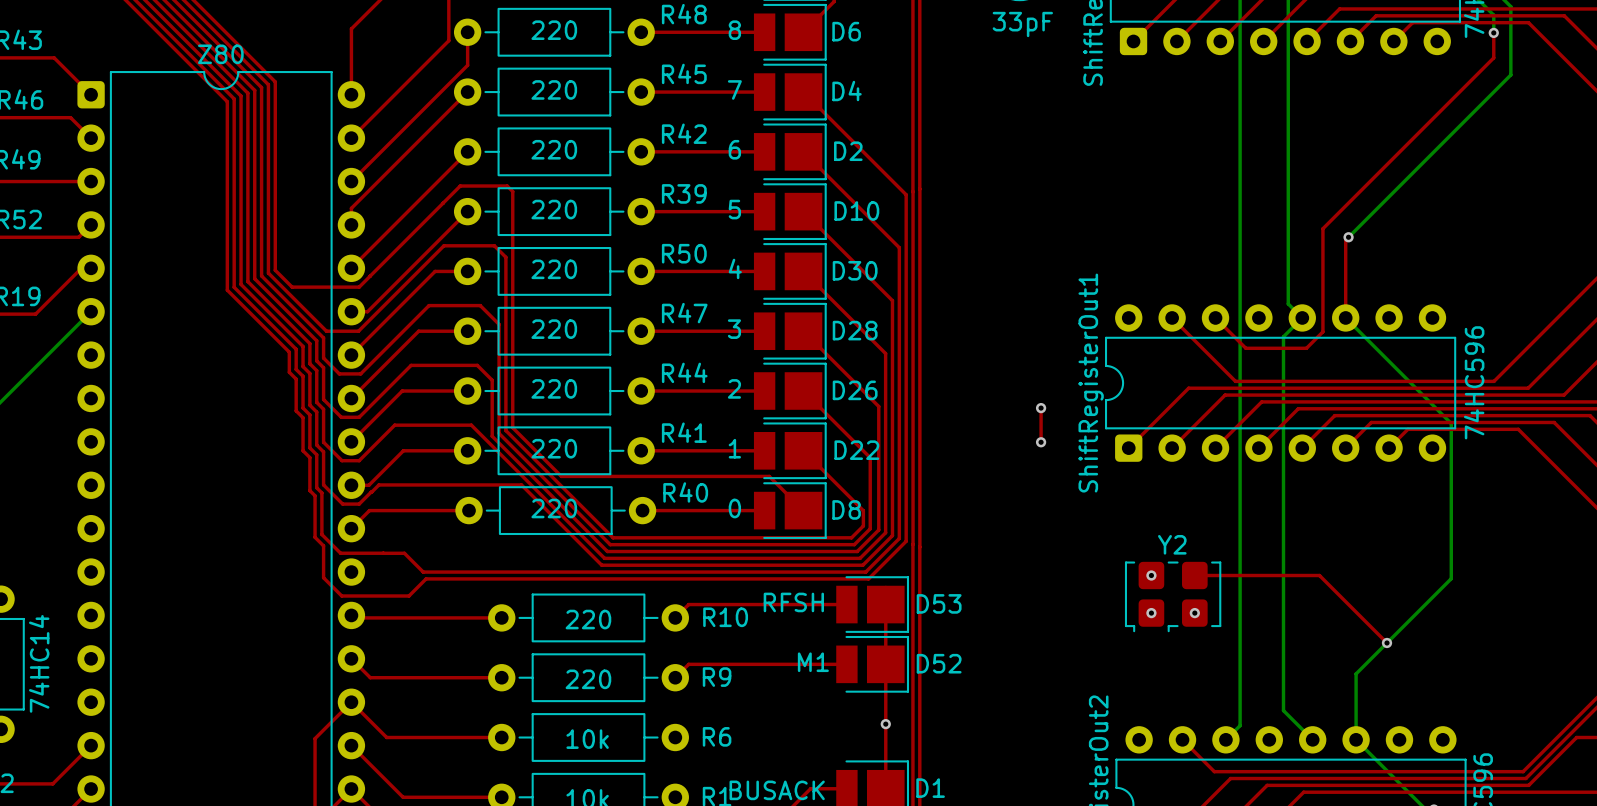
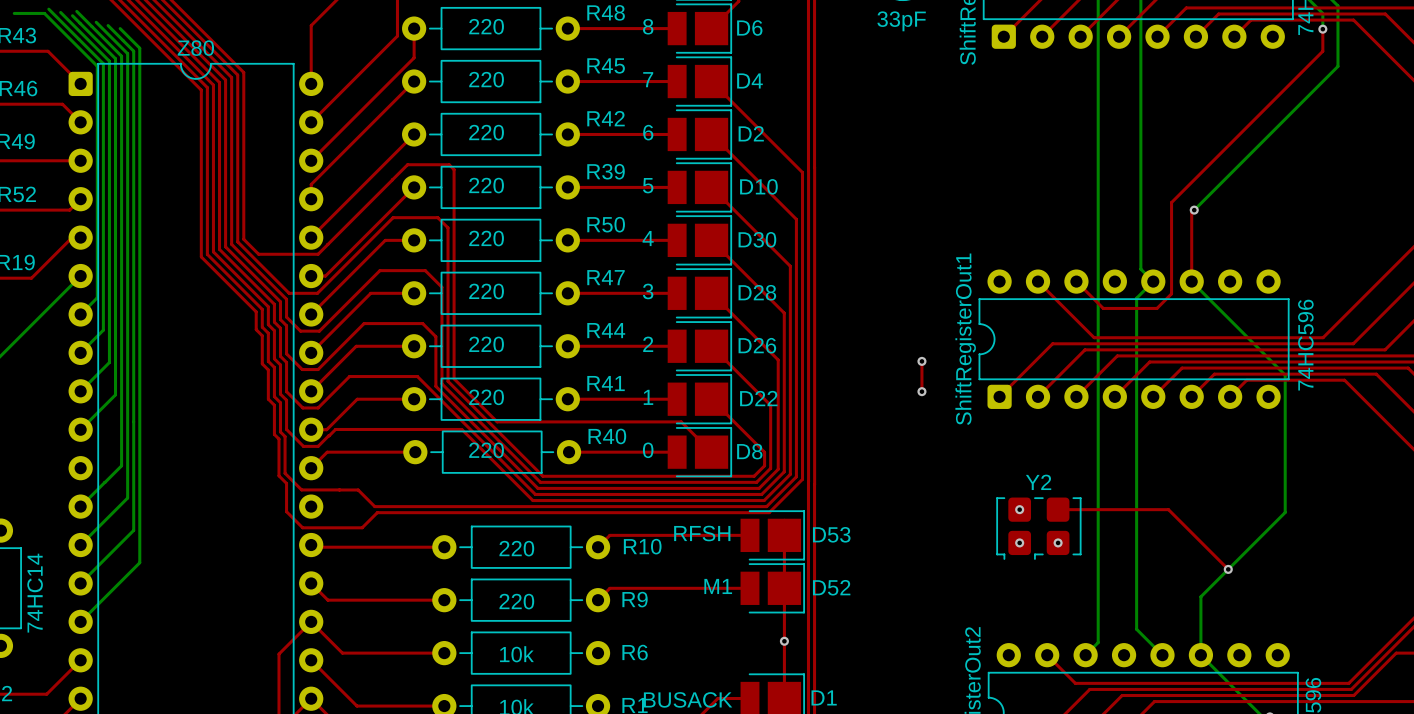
bottom track: none -> (48, 9) (103, 63) (103, 330) (80, 352)
bottom track: none -> (76, 11) (121, 56) (121, 465) (105, 482)
bottom track: none -> (60, 12) (109, 61) (109, 362) (80, 391)
bottom track: none -> (14, 13) (44, 13) (97, 66) (97, 297) (80, 314)
bottom track: none -> (72, 15) (115, 58) (115, 394) (80, 429)
bottom track: none -> (96, 22) (127, 53) (127, 498) (80, 545)
bottom track: none -> (108, 25) (133, 51) (133, 530) (80, 583)
bottom track: none -> (120, 28) (139, 48) (139, 562) (80, 621)
bottom track: none -> (104, 482) (80, 506)

